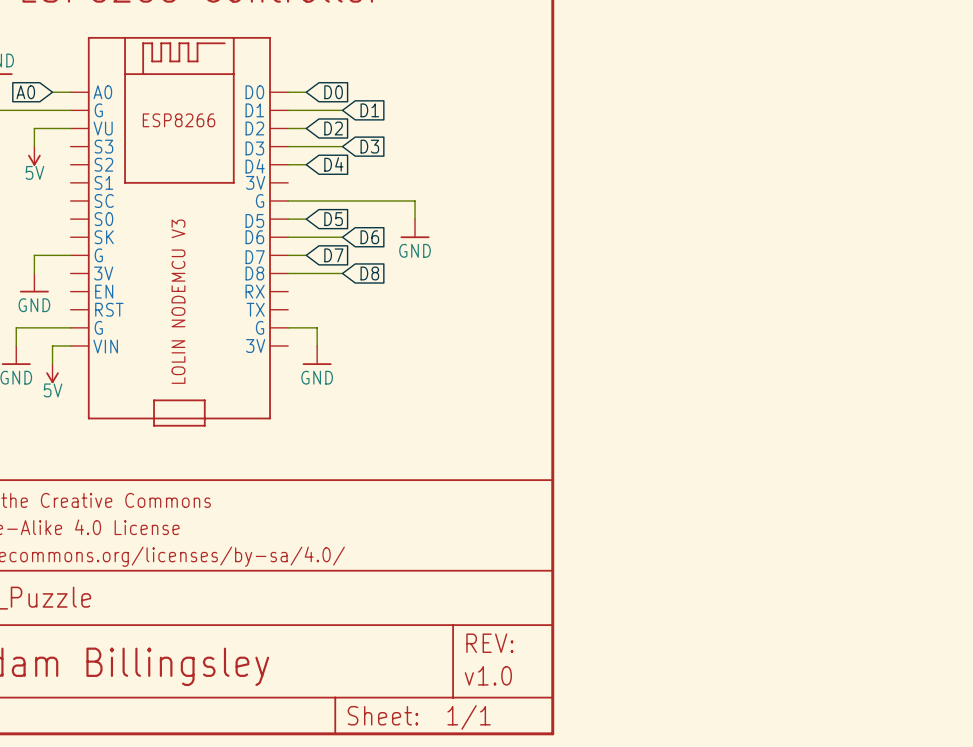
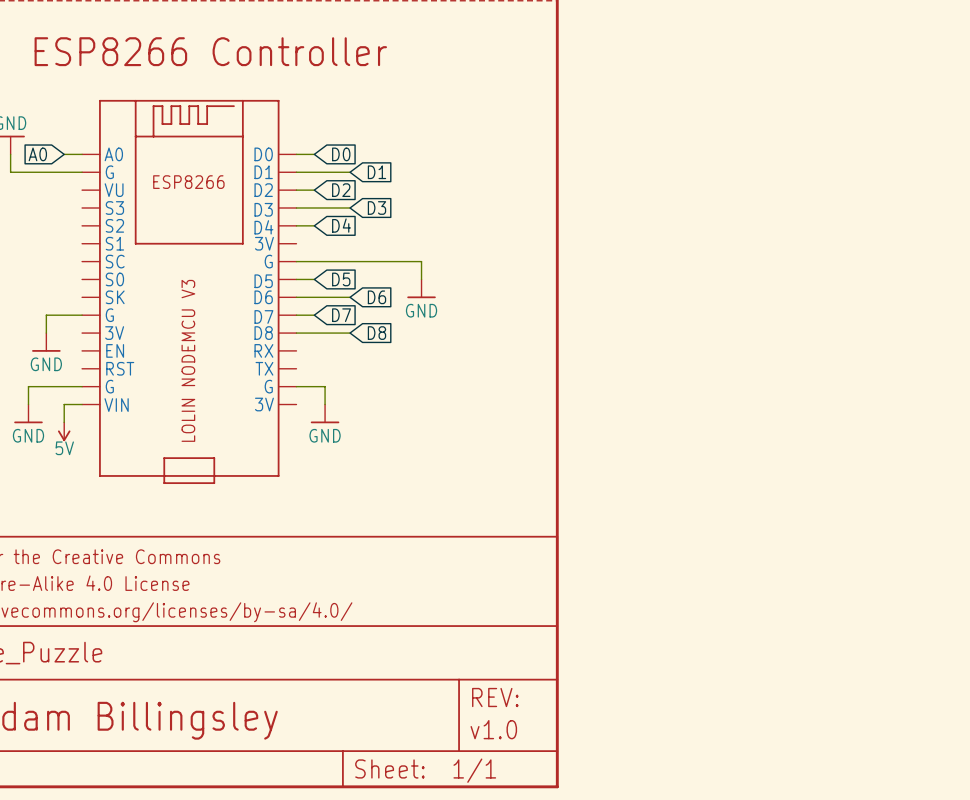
wire: (70, 128) (34, 128) (34, 146) -> none
power symbol: 5V (34, 156) -> none

